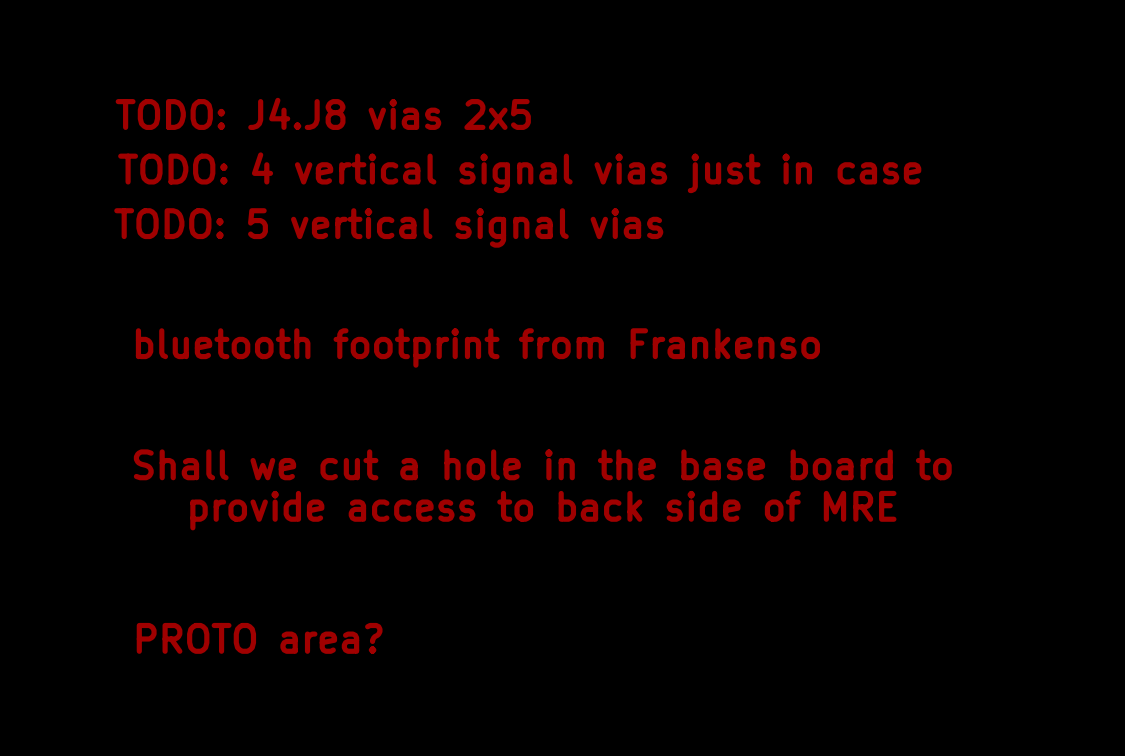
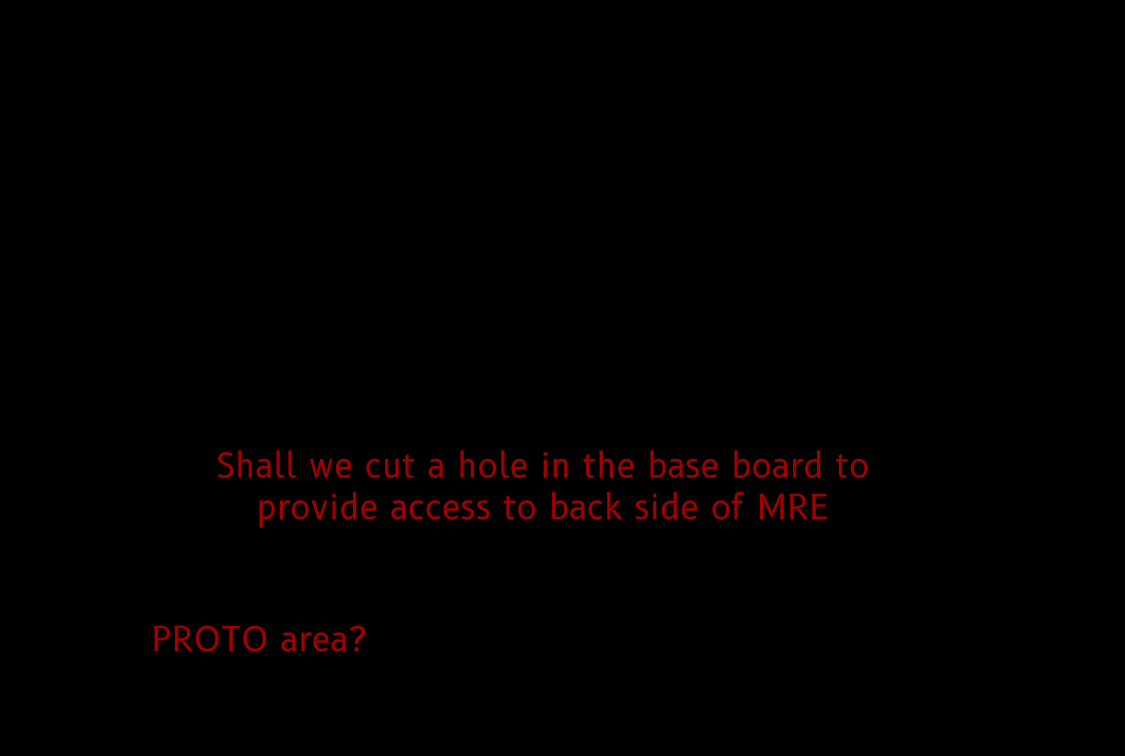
text: TODO: J4.J8 vias 2x5 (323, 113) -> none
text: TODO: 4 vertical signal vias just in case (519, 172) -> none
text: TODO: 5 vertical signal vias (388, 227) -> none
text: bluetooth footprint from Frankenso (477, 347) -> none

